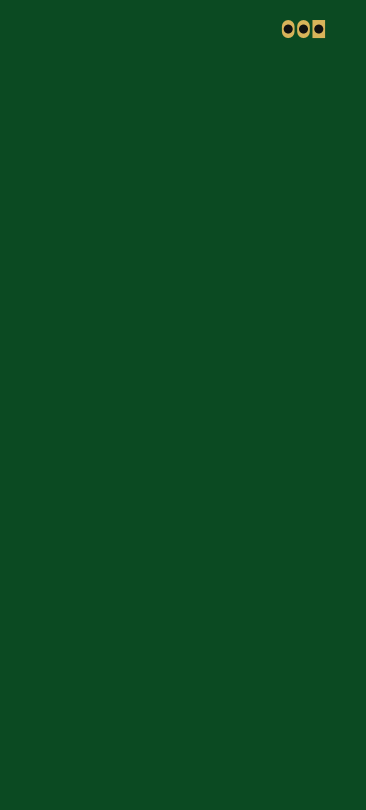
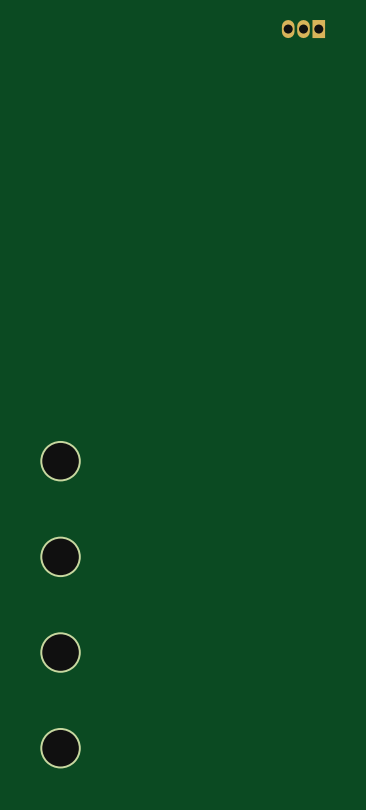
part: none -> (60, 461)
part: none -> (60, 556)
part: none -> (60, 652)
part: none -> (60, 748)

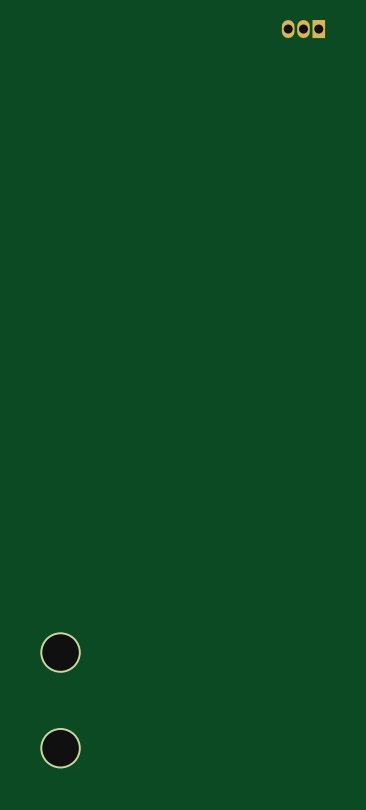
part: (60, 461) -> none
part: (60, 556) -> none

